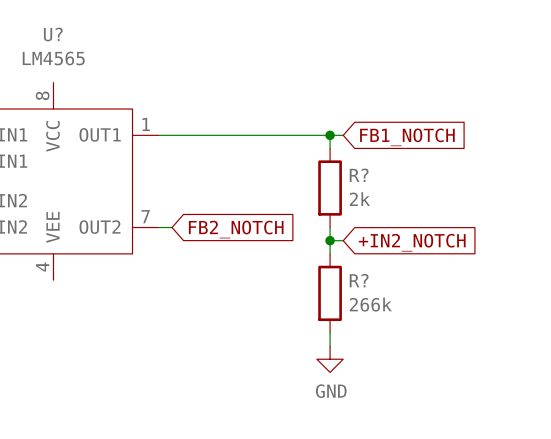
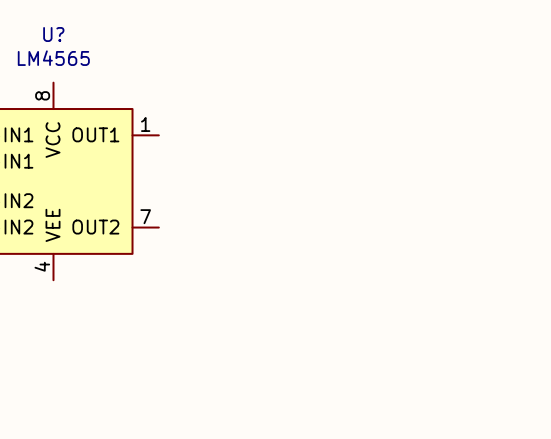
wire: (158, 135) (343, 135) -> none
wire: (330, 135) (330, 148) -> none
junction: (330, 135) -> none
global label: FB1_NOTCH (407, 137) -> none
R?: 2k (330, 188) -> none
wire: (158, 227) (172, 227) -> none
wire: (330, 227) (330, 253) -> none
global label: FB2_NOTCH (236, 229) -> none
wire: (330, 240) (343, 240) -> none
junction: (330, 240) -> none
global label: +IN2_NOTCH (412, 242) -> none
R?: 266k (330, 293) -> none
wire: (330, 332) (330, 346) -> none
power symbol: GND (330, 359) -> none

